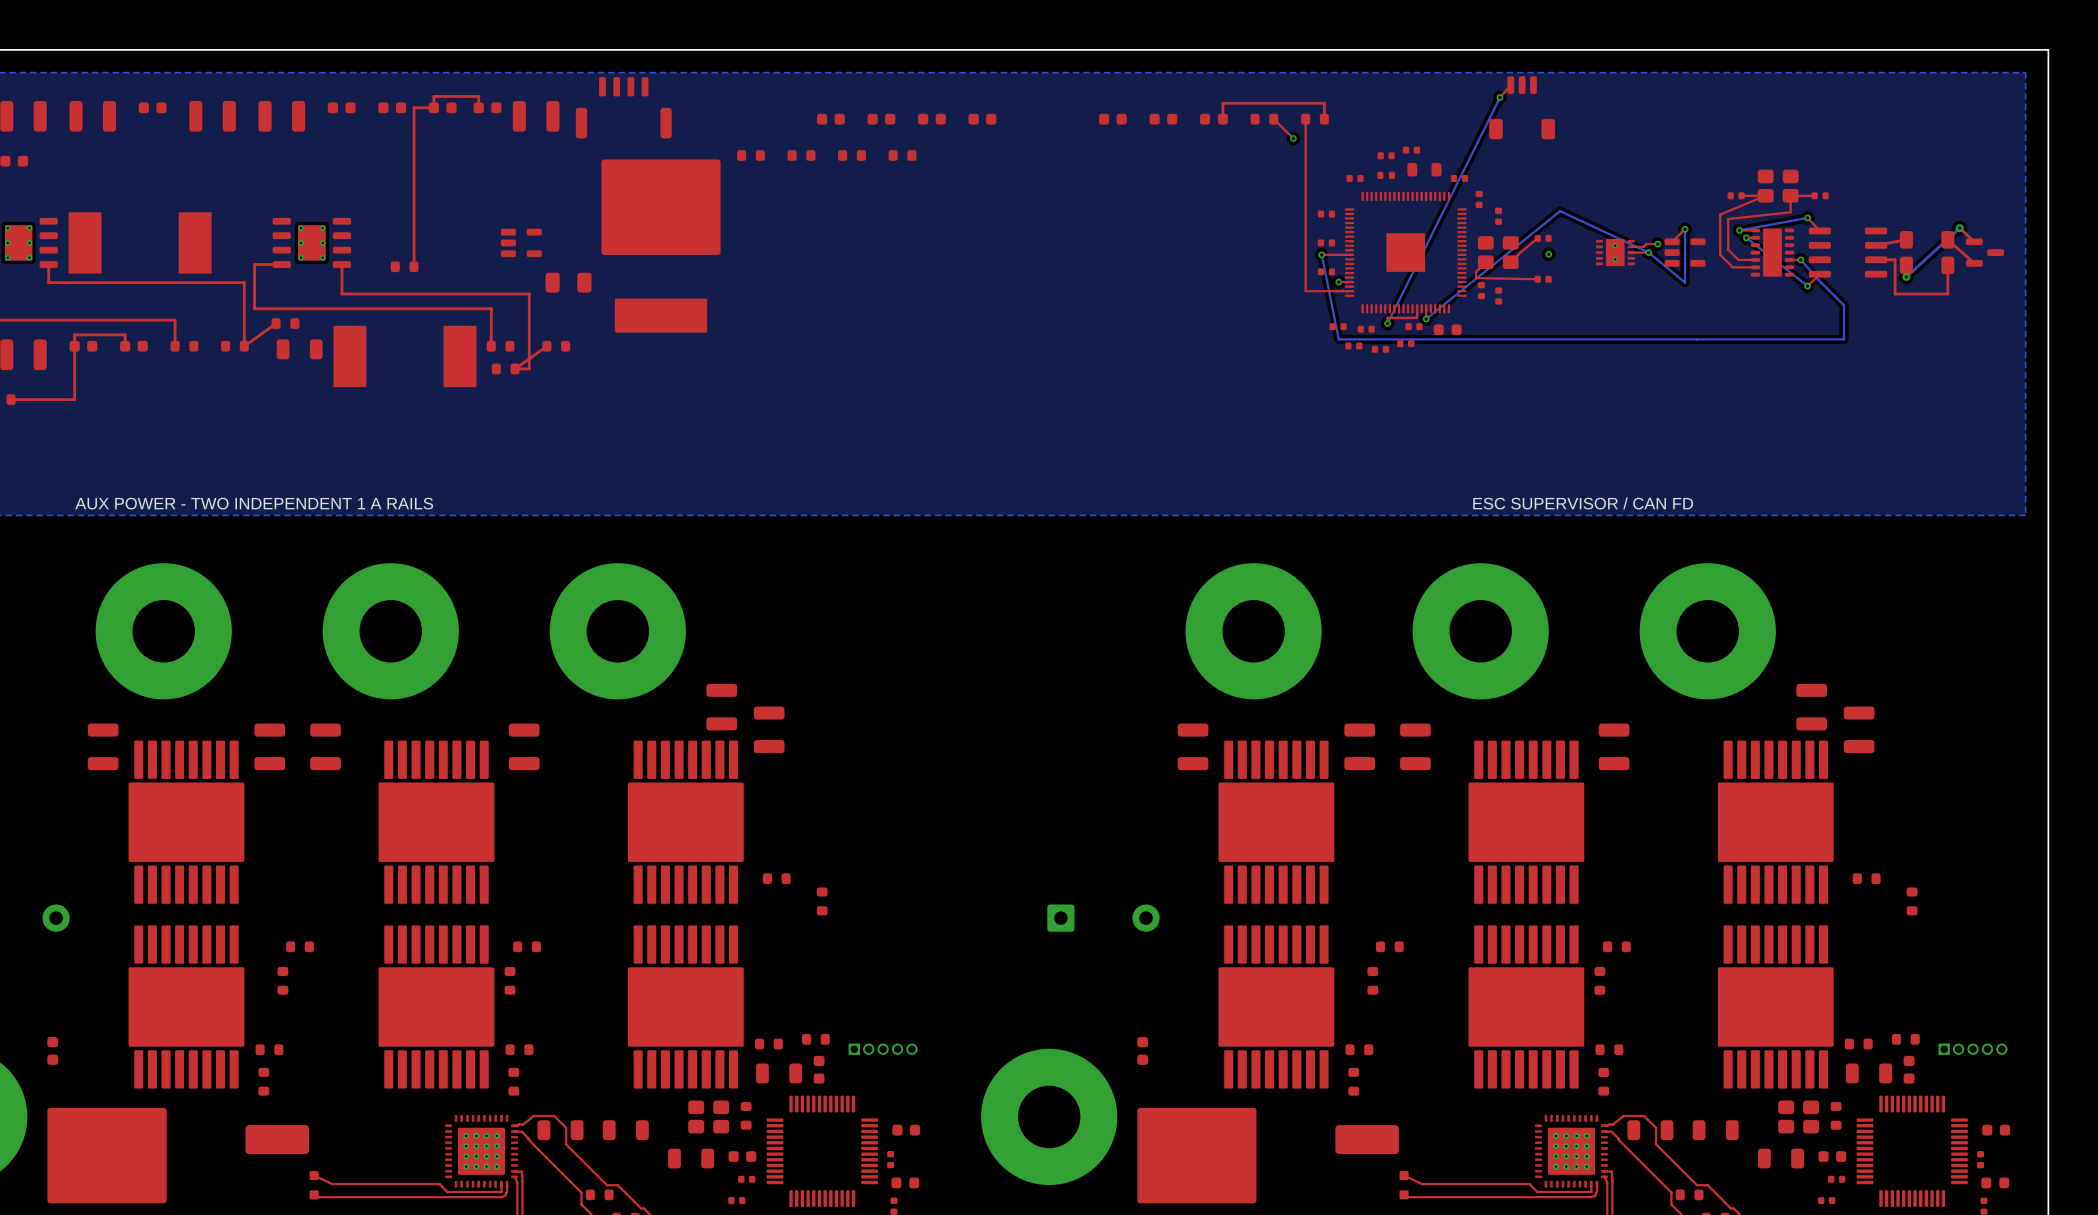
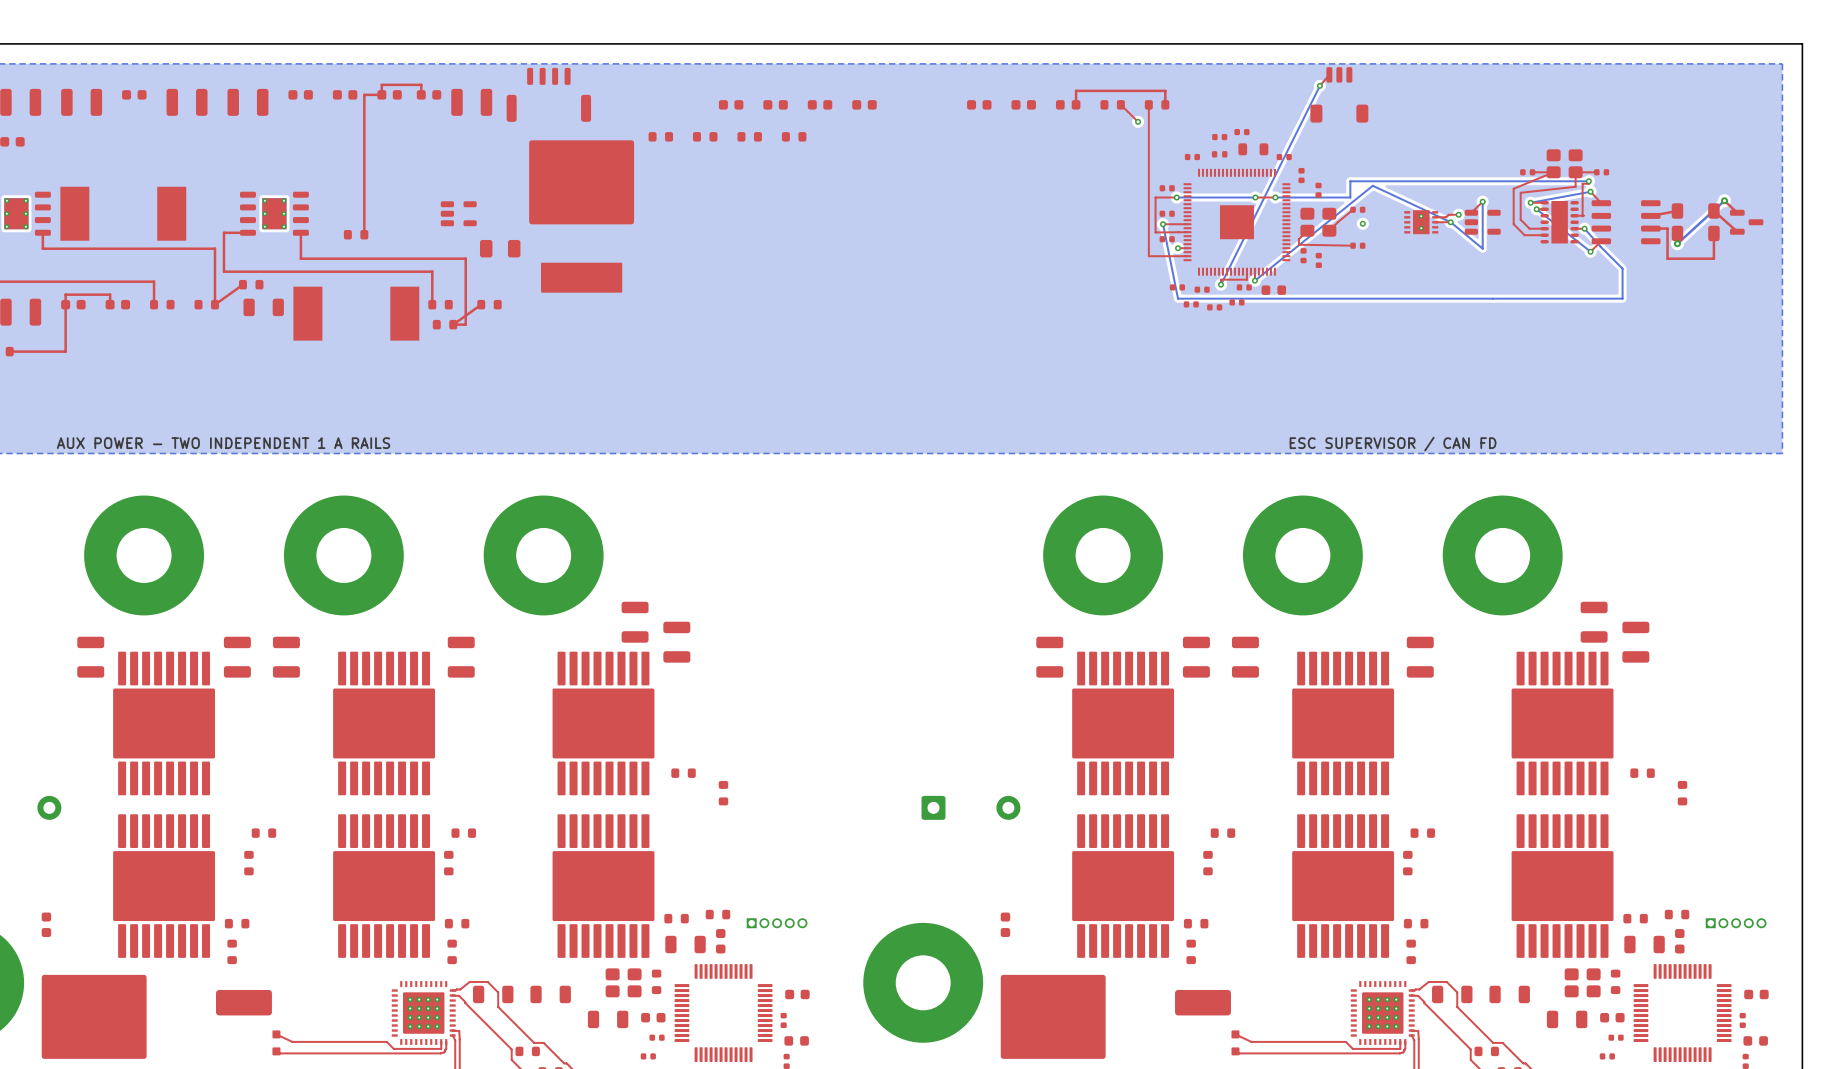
top track: none -> (1588, 181) (1588, 183) (1582, 183) (1583, 215) (1574, 215)
bottom track: none -> (1588, 181) (1350, 181) (1350, 197) (1275, 197)
via: none -> (1588, 181)
top track: none -> (1176, 197) (1155, 197) (1155, 232) (1187, 232)
bottom track: none -> (1176, 197) (1255, 197)
via: none -> (1176, 197)
top track: none -> (1255, 197) (1275, 197)
via: none -> (1255, 197)
via: none -> (1275, 197)

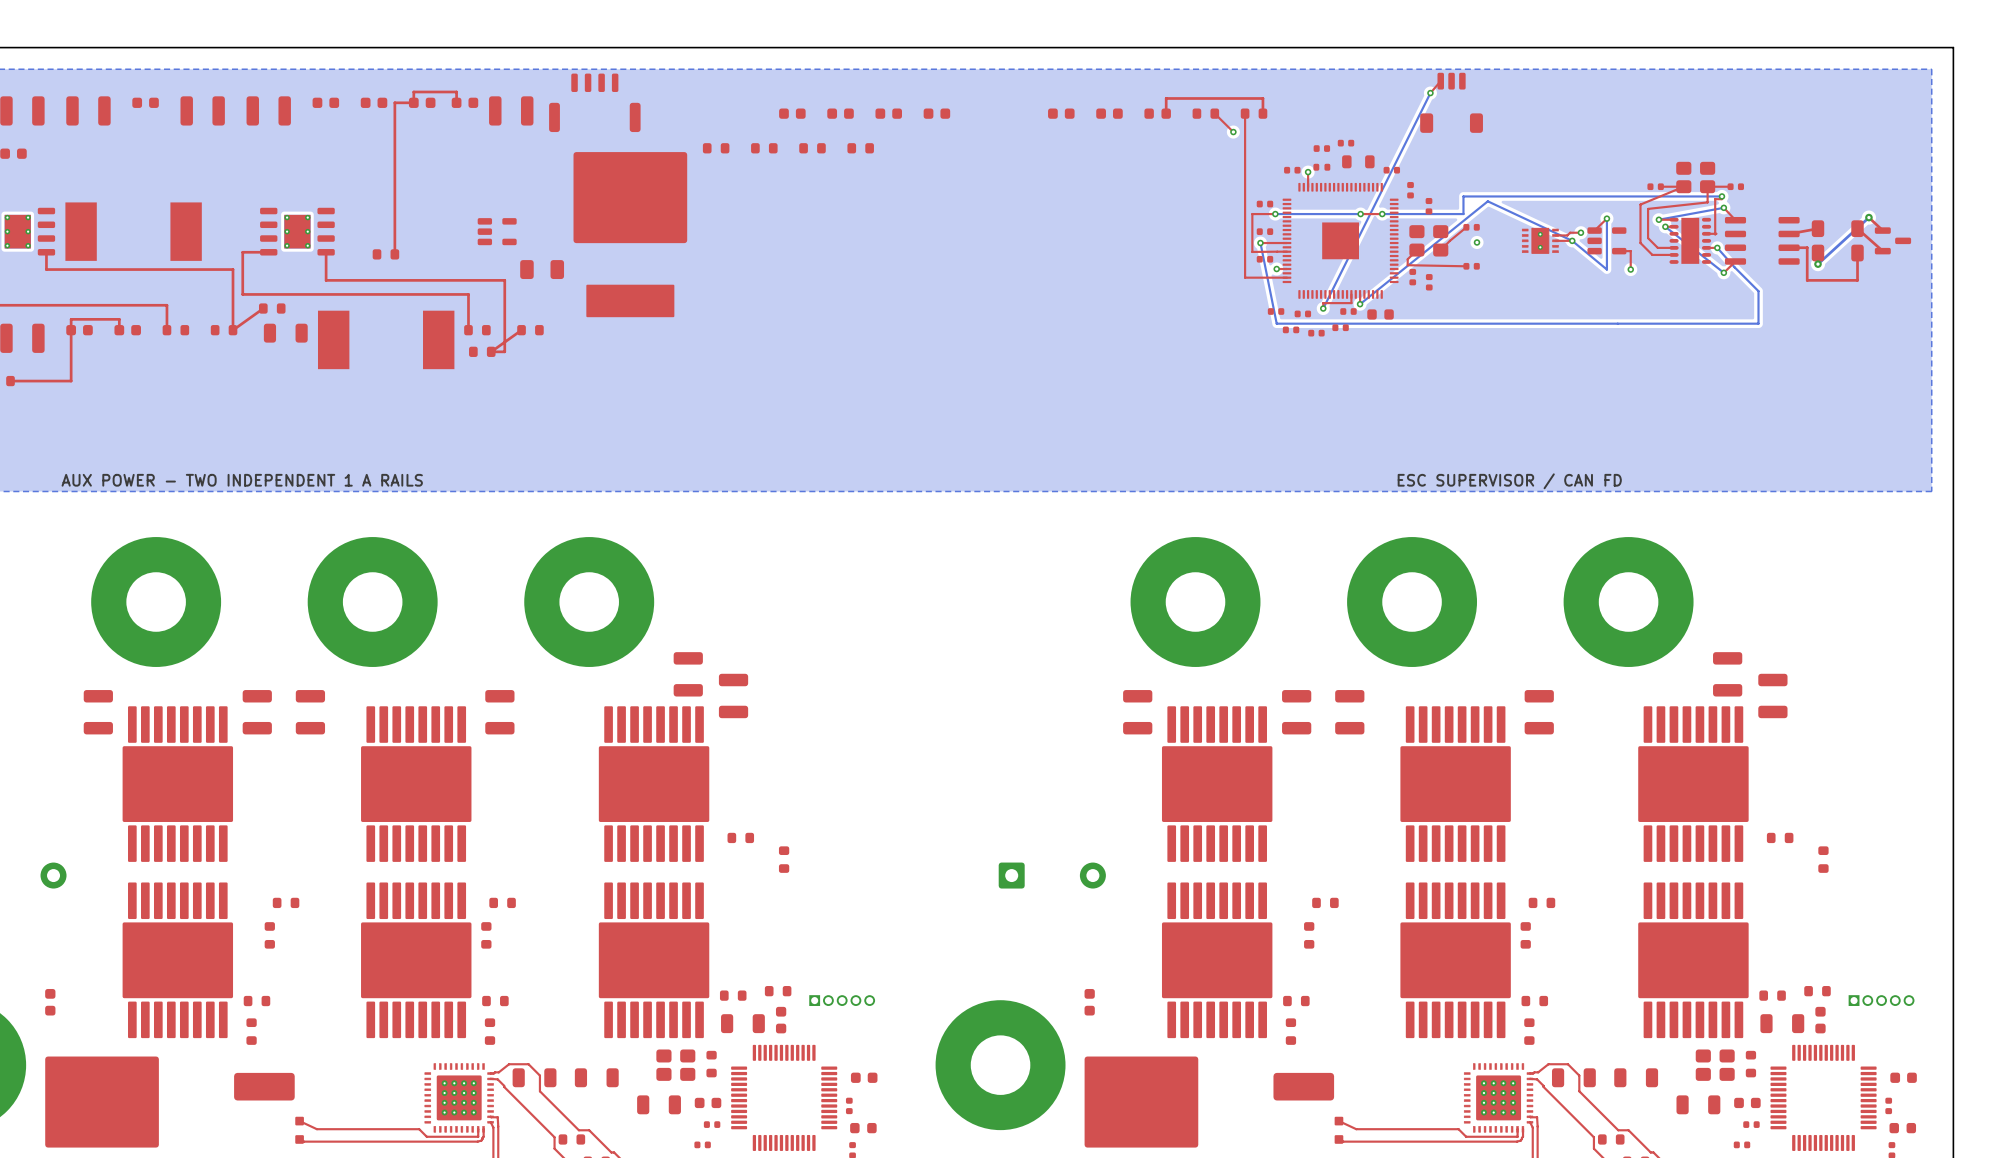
top track: none -> (1308, 172) (1308, 187)
via: none -> (1308, 172)
top track: none -> (1619, 251) (1630, 251) (1630, 269)
via: none -> (1630, 269)

